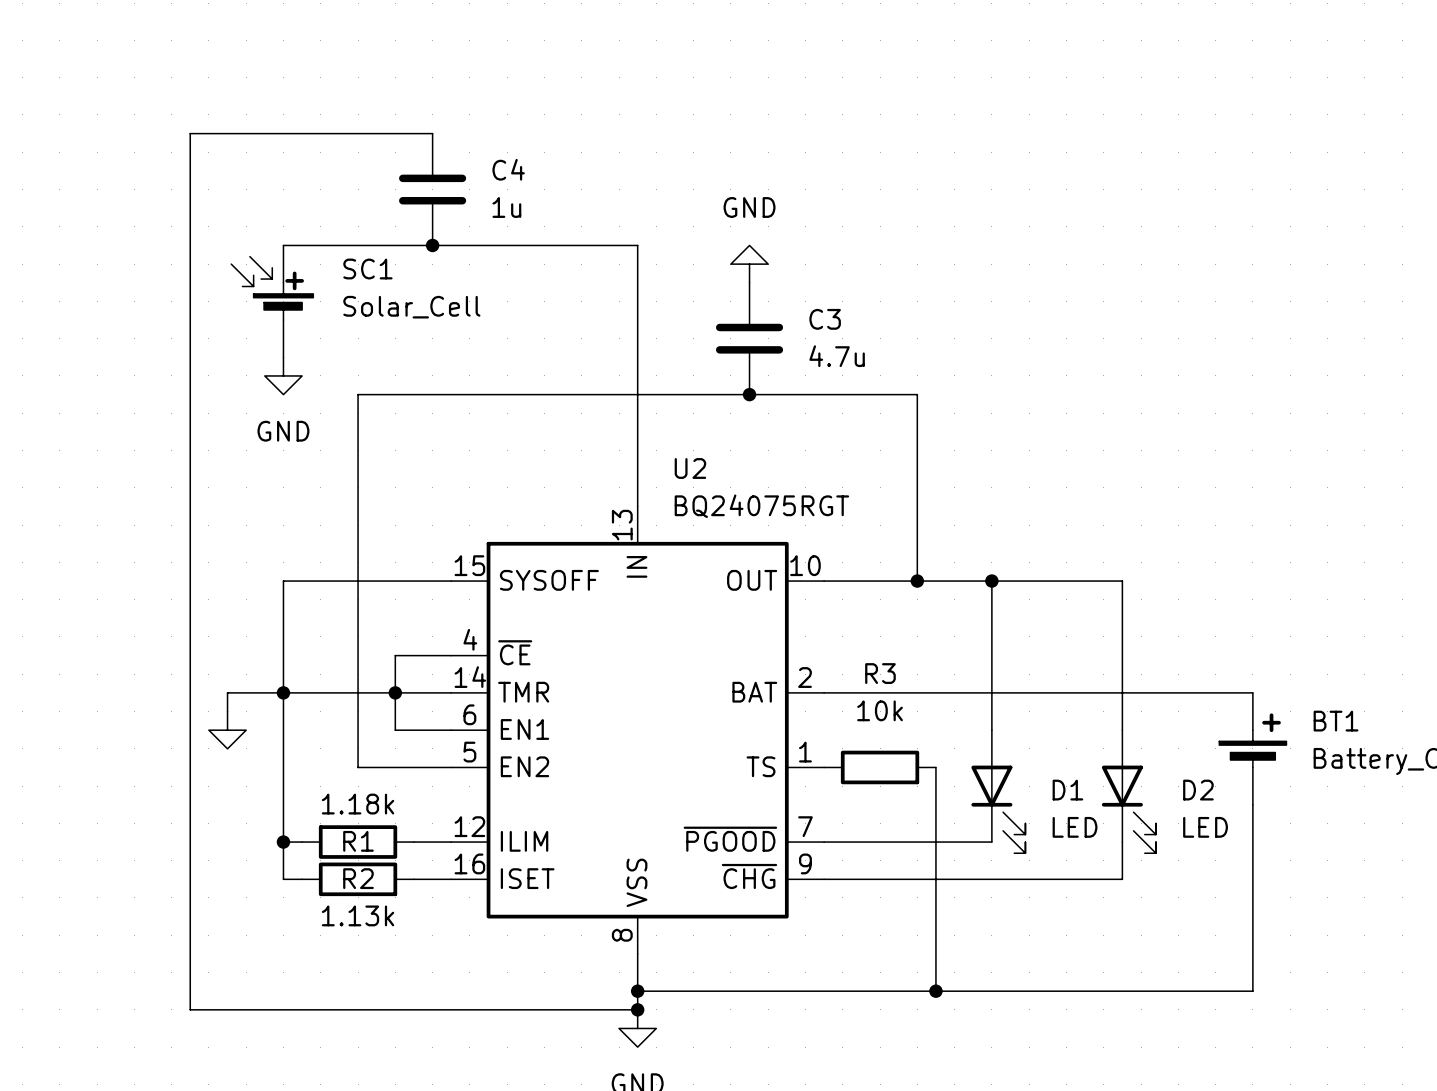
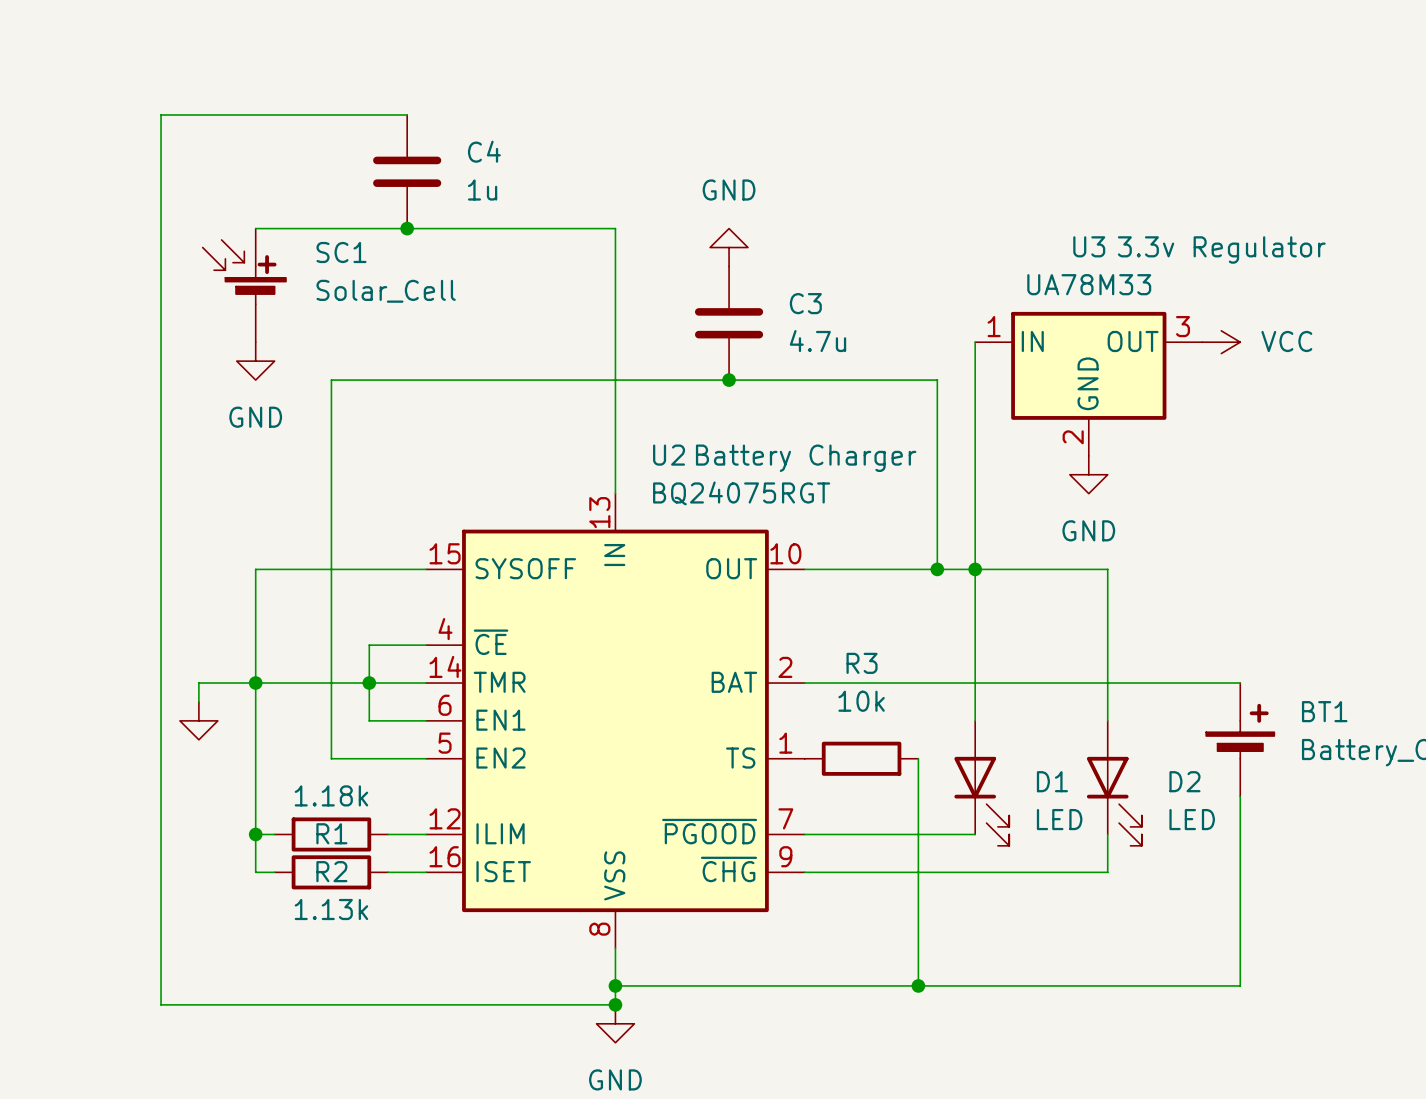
wire: none -> (975, 342) (975, 569)
power symbol: none -> VCC (1221, 342)
wire: (917, 394) (917, 581) -> (899, 380) (937, 380) (937, 569)
U3: none -> UA78M33 (1088, 383)
U2 text: none -> Battery Charger (806, 458)
power symbol: none -> GND (1088, 474)
junction position: (917, 581) -> (937, 569)

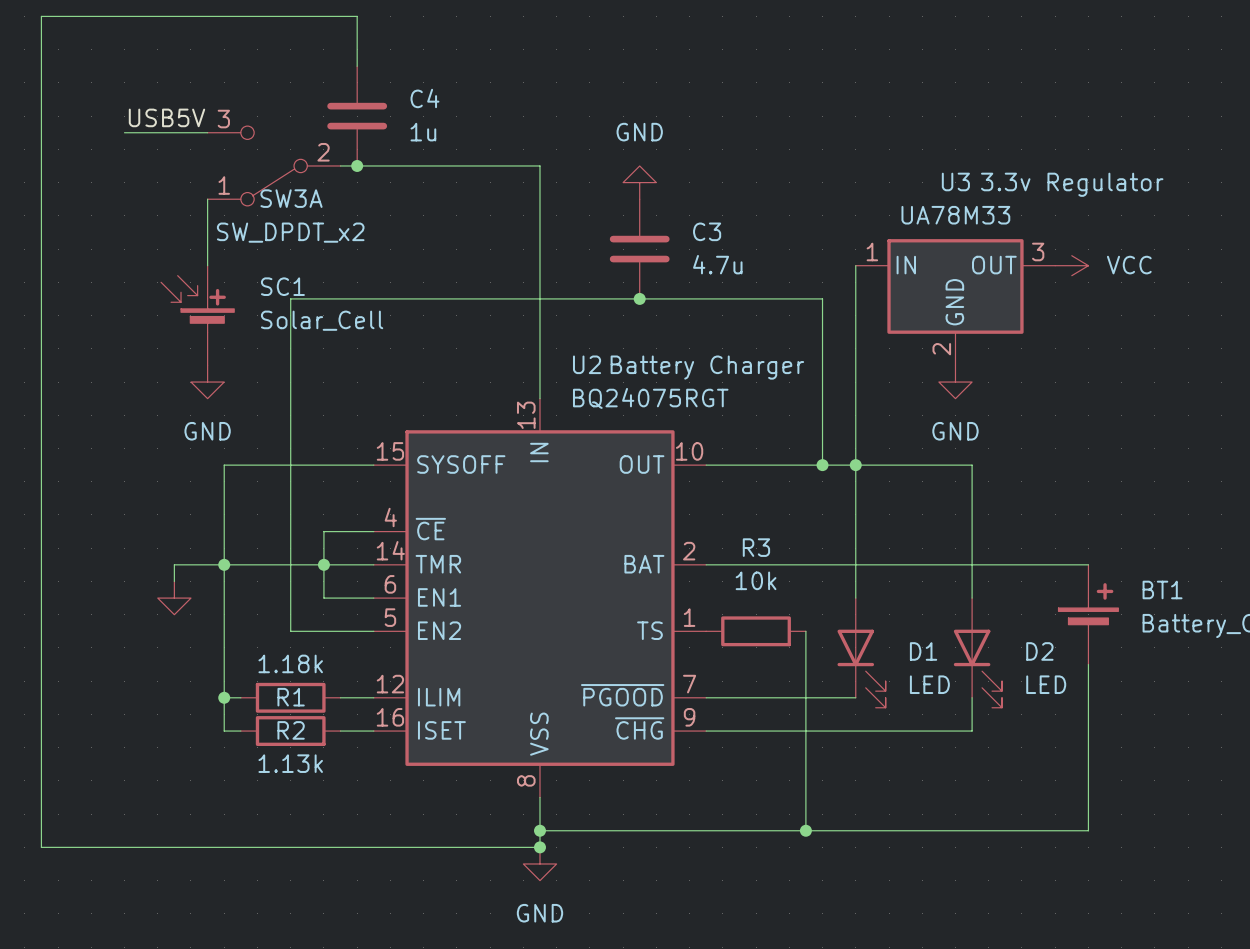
wire: (407, 114) (161, 114) (161, 1004) -> (357, 66) (357, 16) (41, 16) (41, 847) (141, 847)
label: none -> USB5V (166, 117)
wire: none -> (124, 132) (207, 132)
wire: (255, 228) (388, 228) -> none
SW3A: none -> SW_DPDT_x2 (274, 165)
wire: none -> (207, 199) (207, 265)
SC1 position: (244, 285) -> (197, 315)
power symbol position: GND (255, 361) -> GND (207, 382)

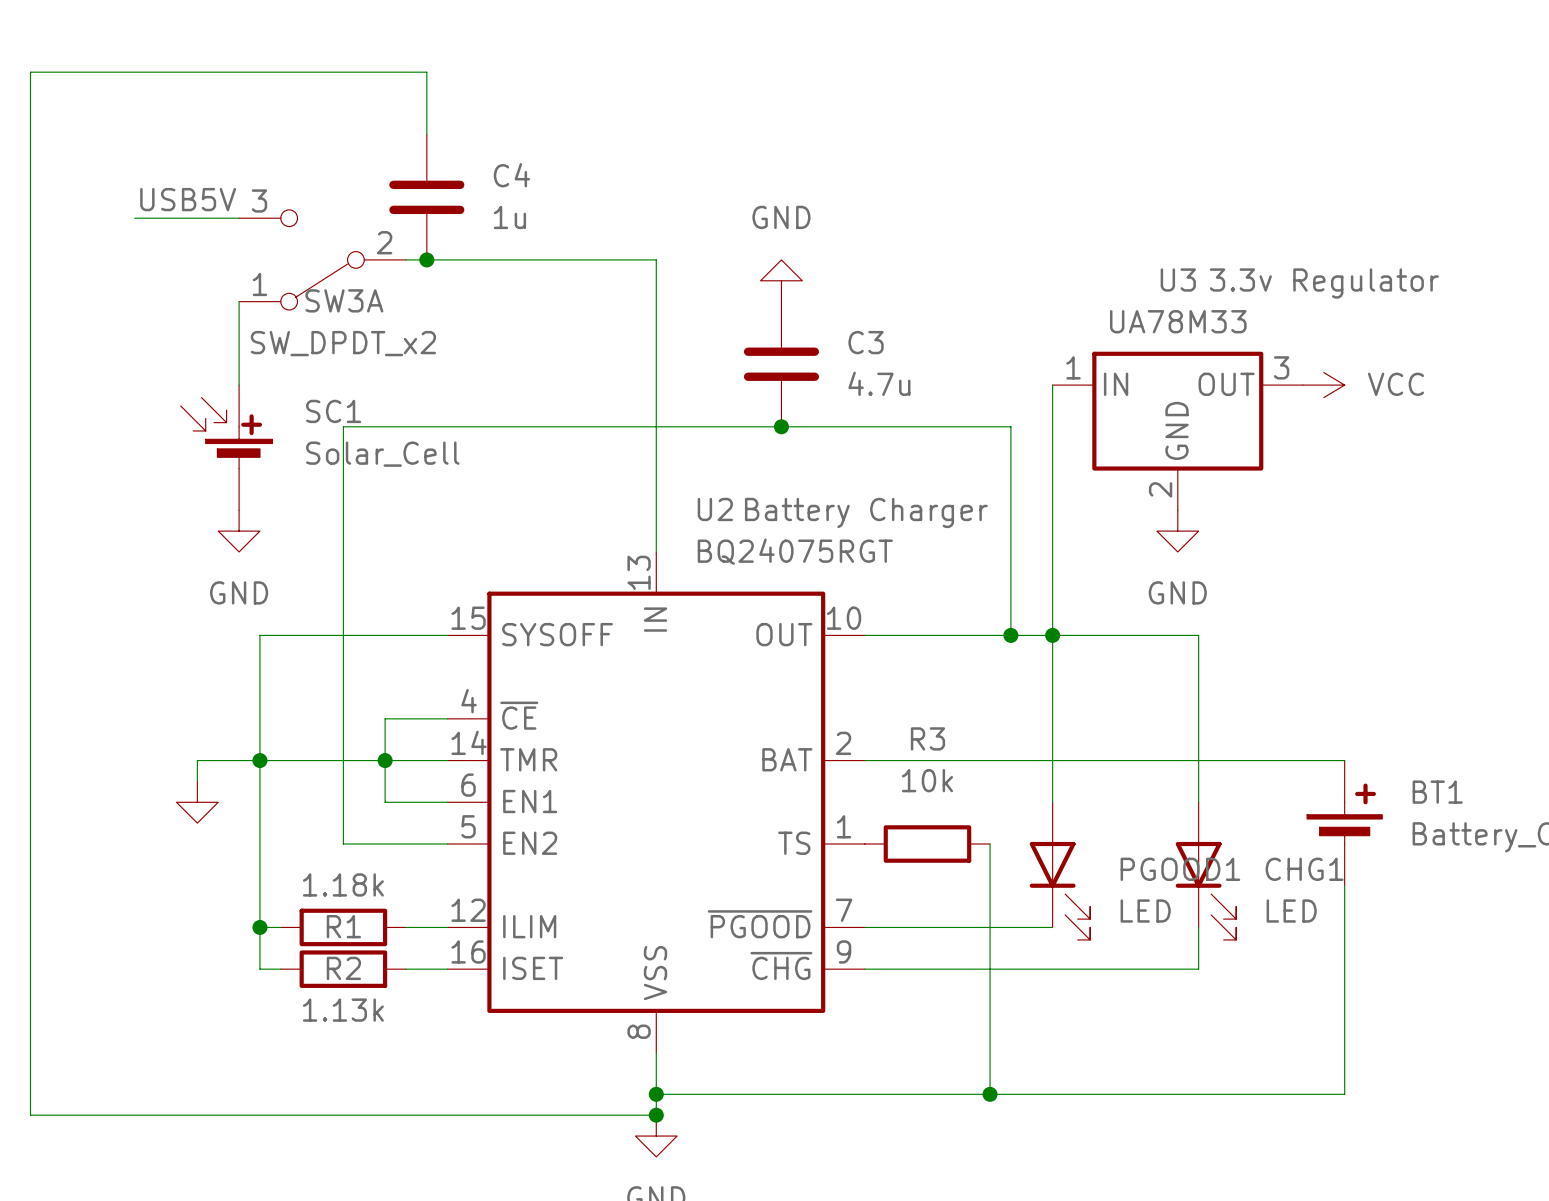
D1 name: D1 (923, 651) -> PGOOD1 (1180, 869)
D2 name: D2 (1039, 651) -> CHG1 (1304, 869)

